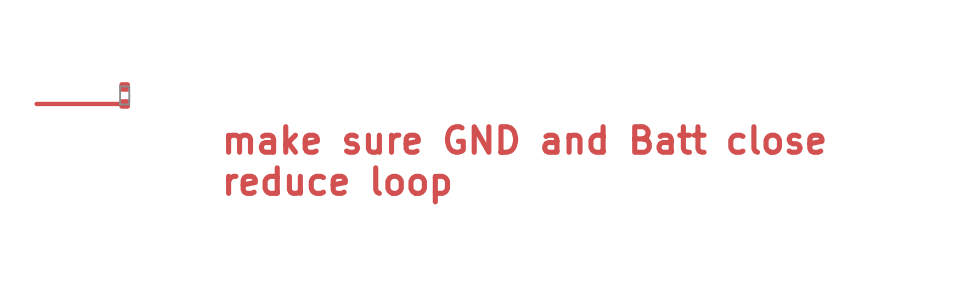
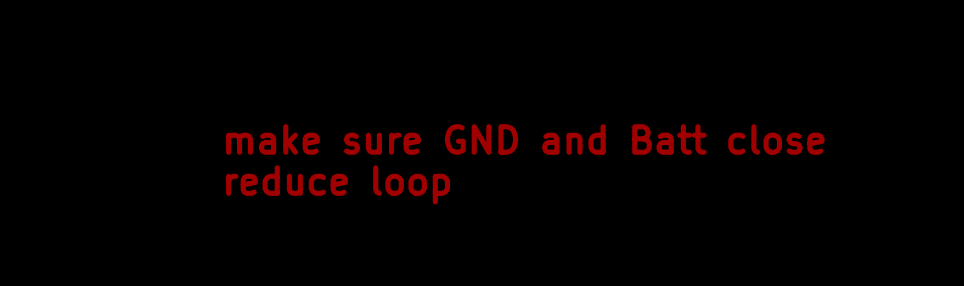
part: (124, 95) -> none
track: (36, 103) (124, 103) -> none

